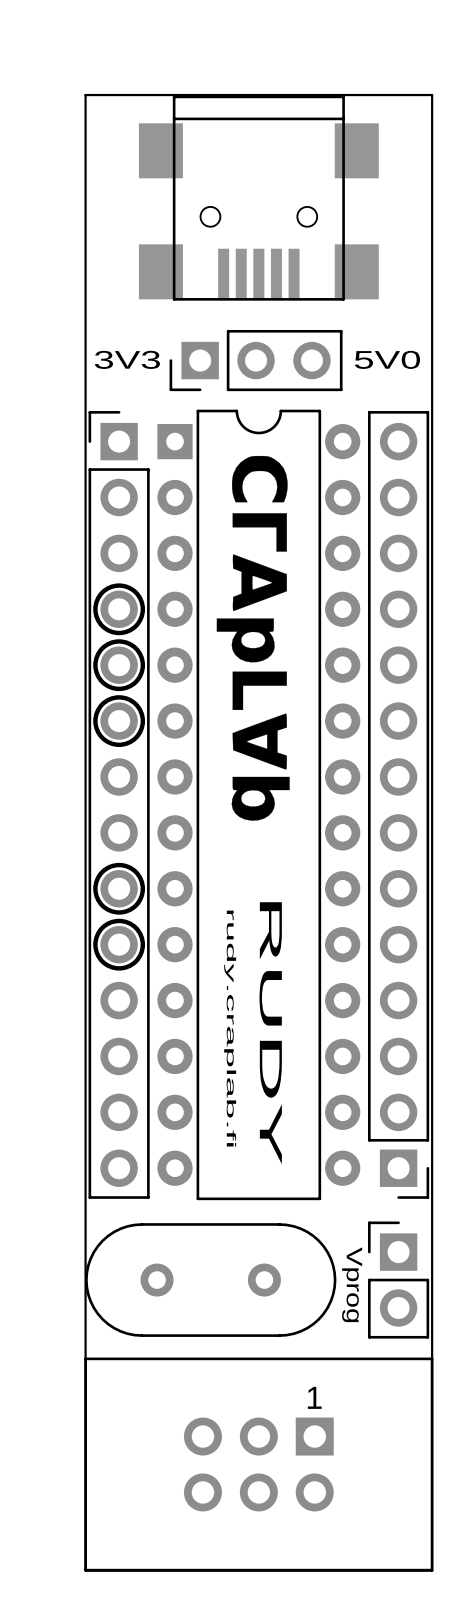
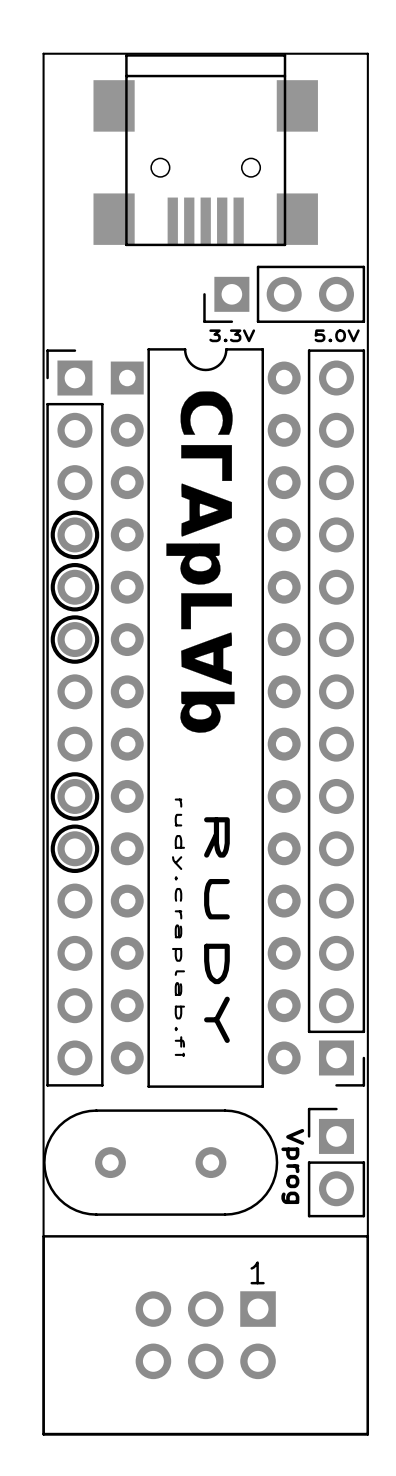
text: 3V3 (127, 359) -> none
text: 5V0 (387, 359) -> none
part position: (256, 360) -> (284, 294)
text: none -> 3.3V (232, 335)
text: none -> 5.0V (337, 335)

